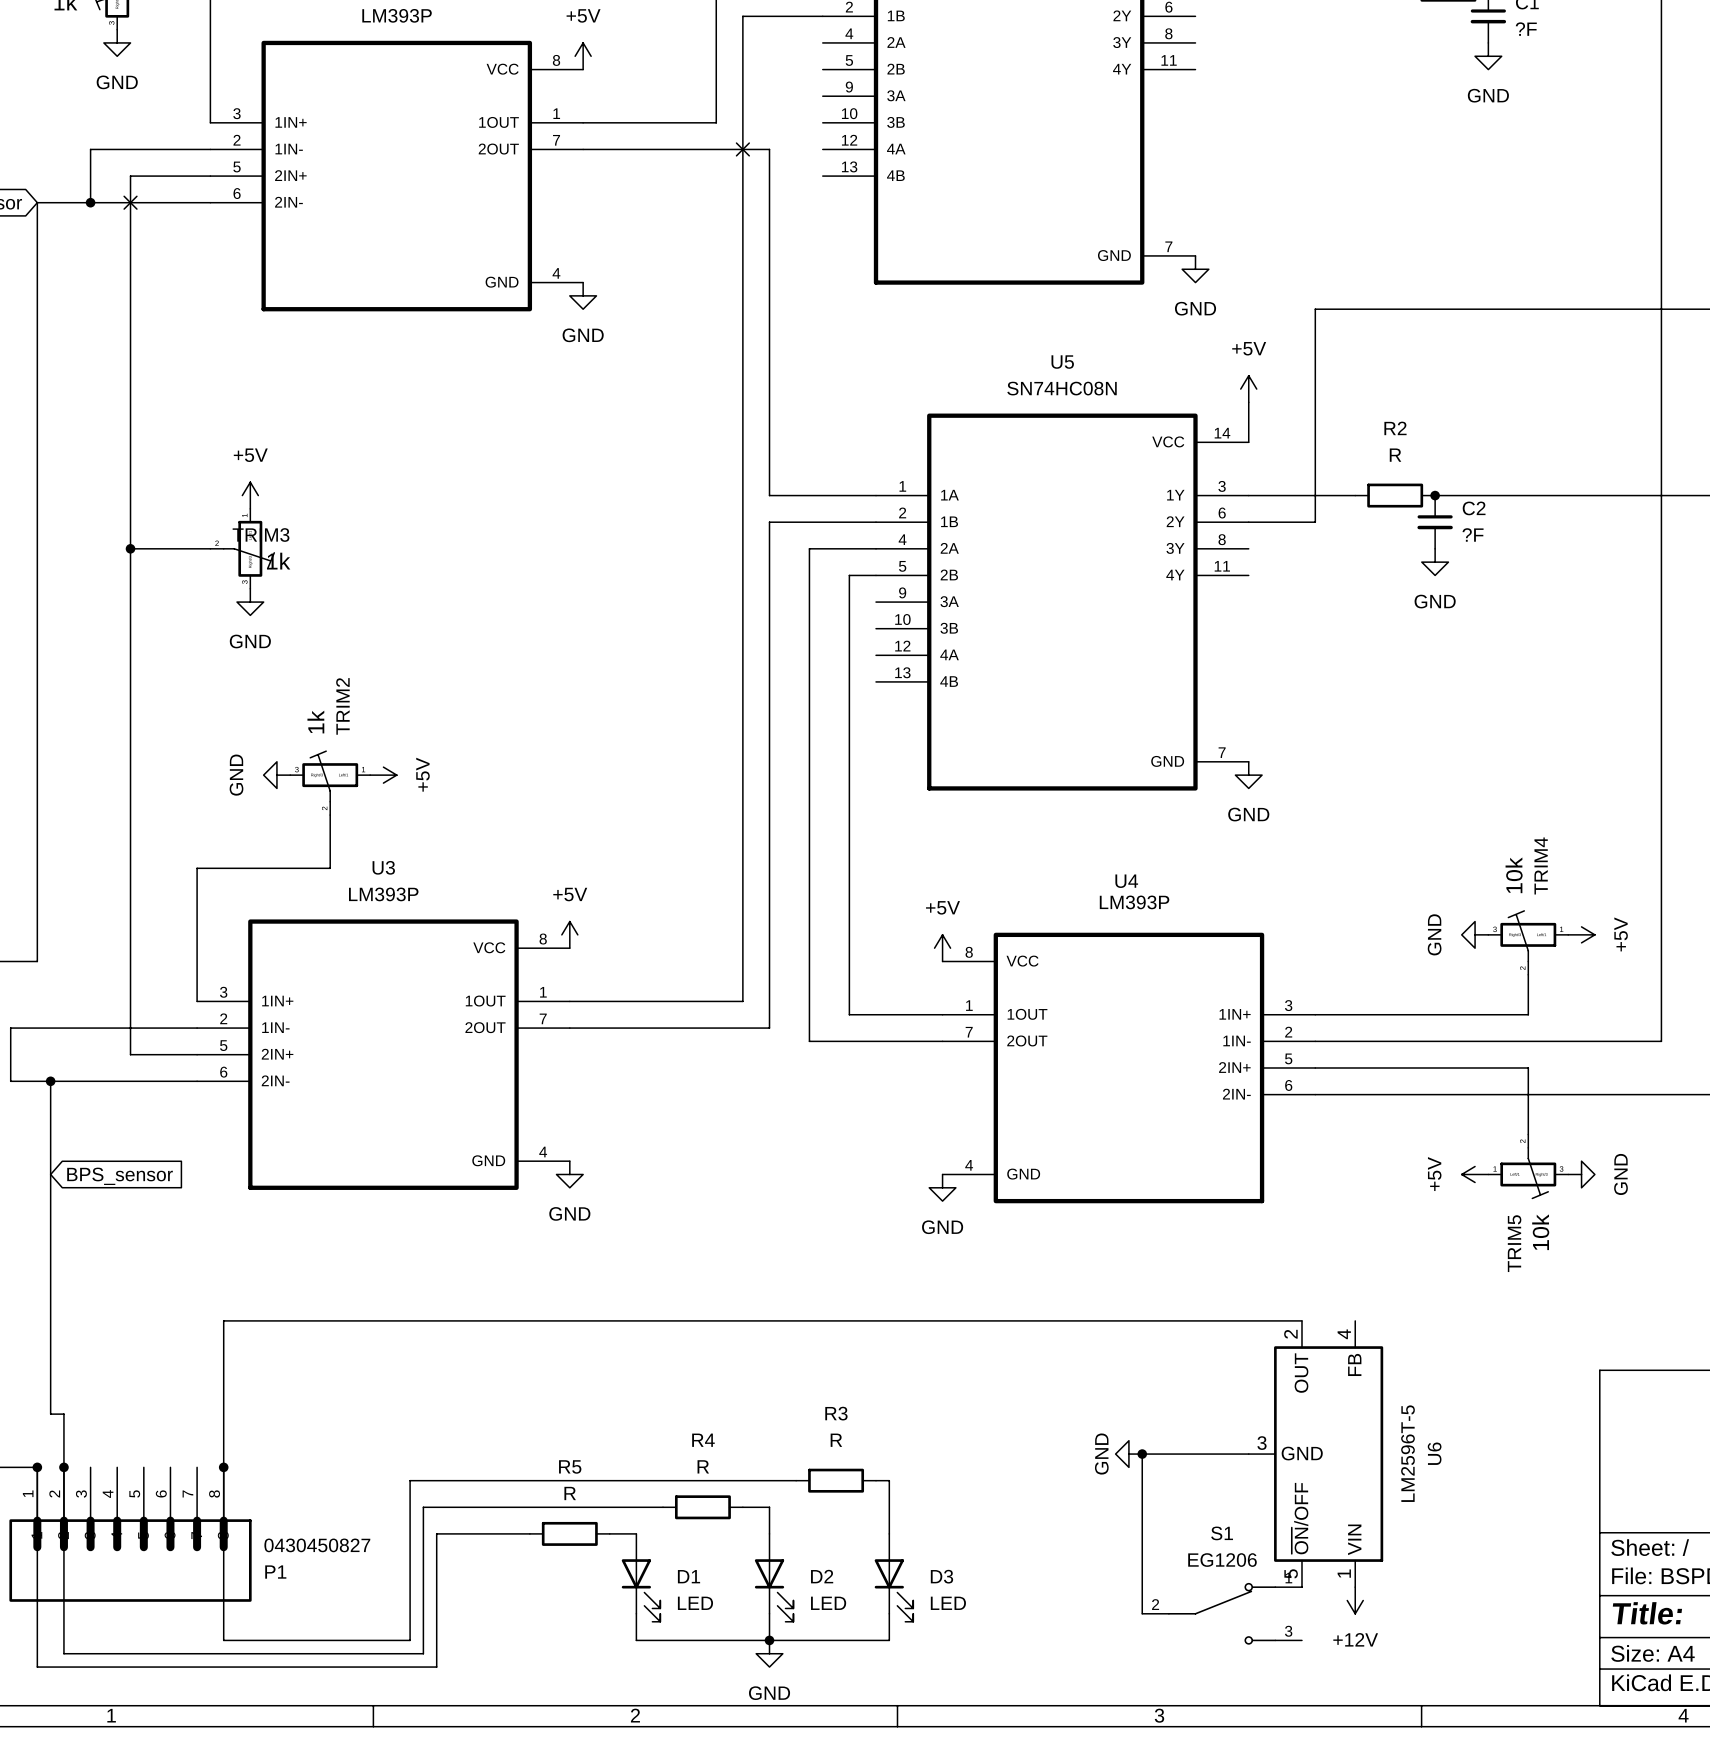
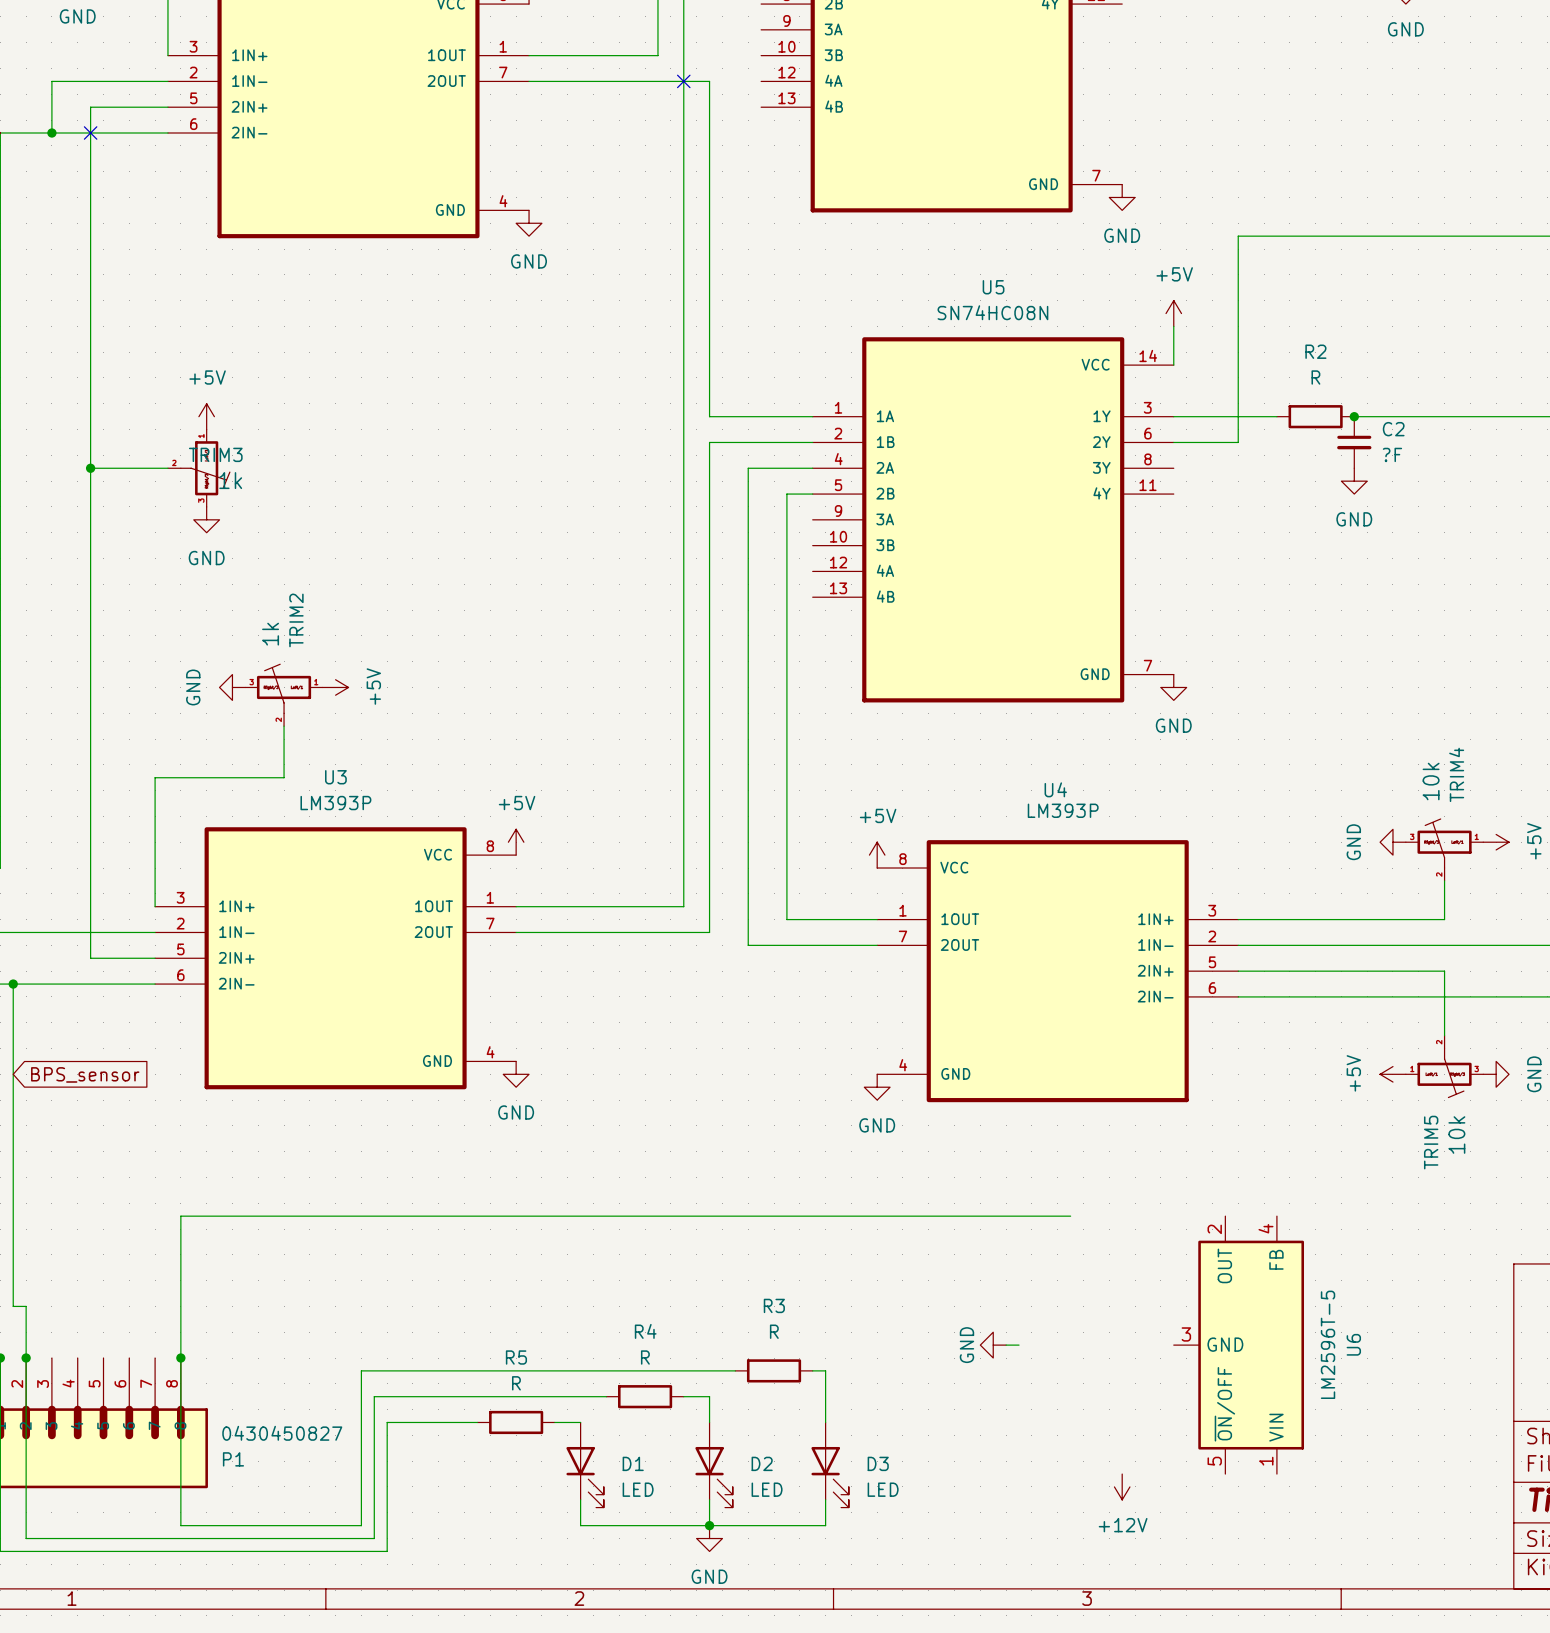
wire: (1142, 1320) (1301, 1320) -> none
wire: none -> (1006, 1345) (1019, 1345)
power symbol position: GND (1128, 1454) -> GND (993, 1345)
junction: (1142, 1454) -> none
wire: (1248, 1454) (1142, 1454) (1142, 1613) -> none
power symbol position: +12V (1355, 1600) -> +12V (1122, 1486)
S1: EG1206 (1222, 1613) -> none

